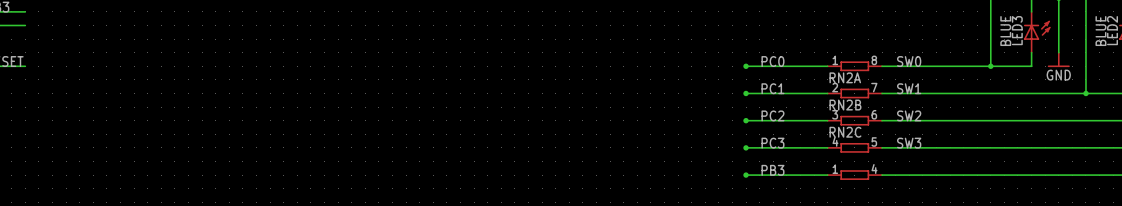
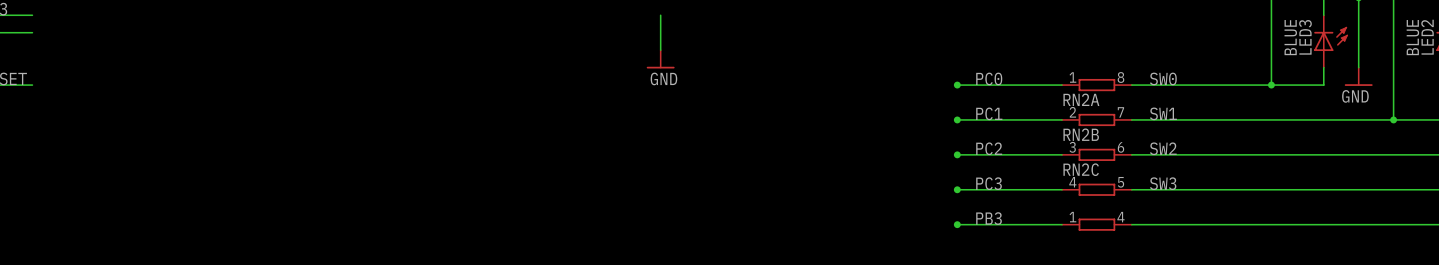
wire: none -> (660, 15) (660, 50)
power symbol: none -> GND (660, 59)

